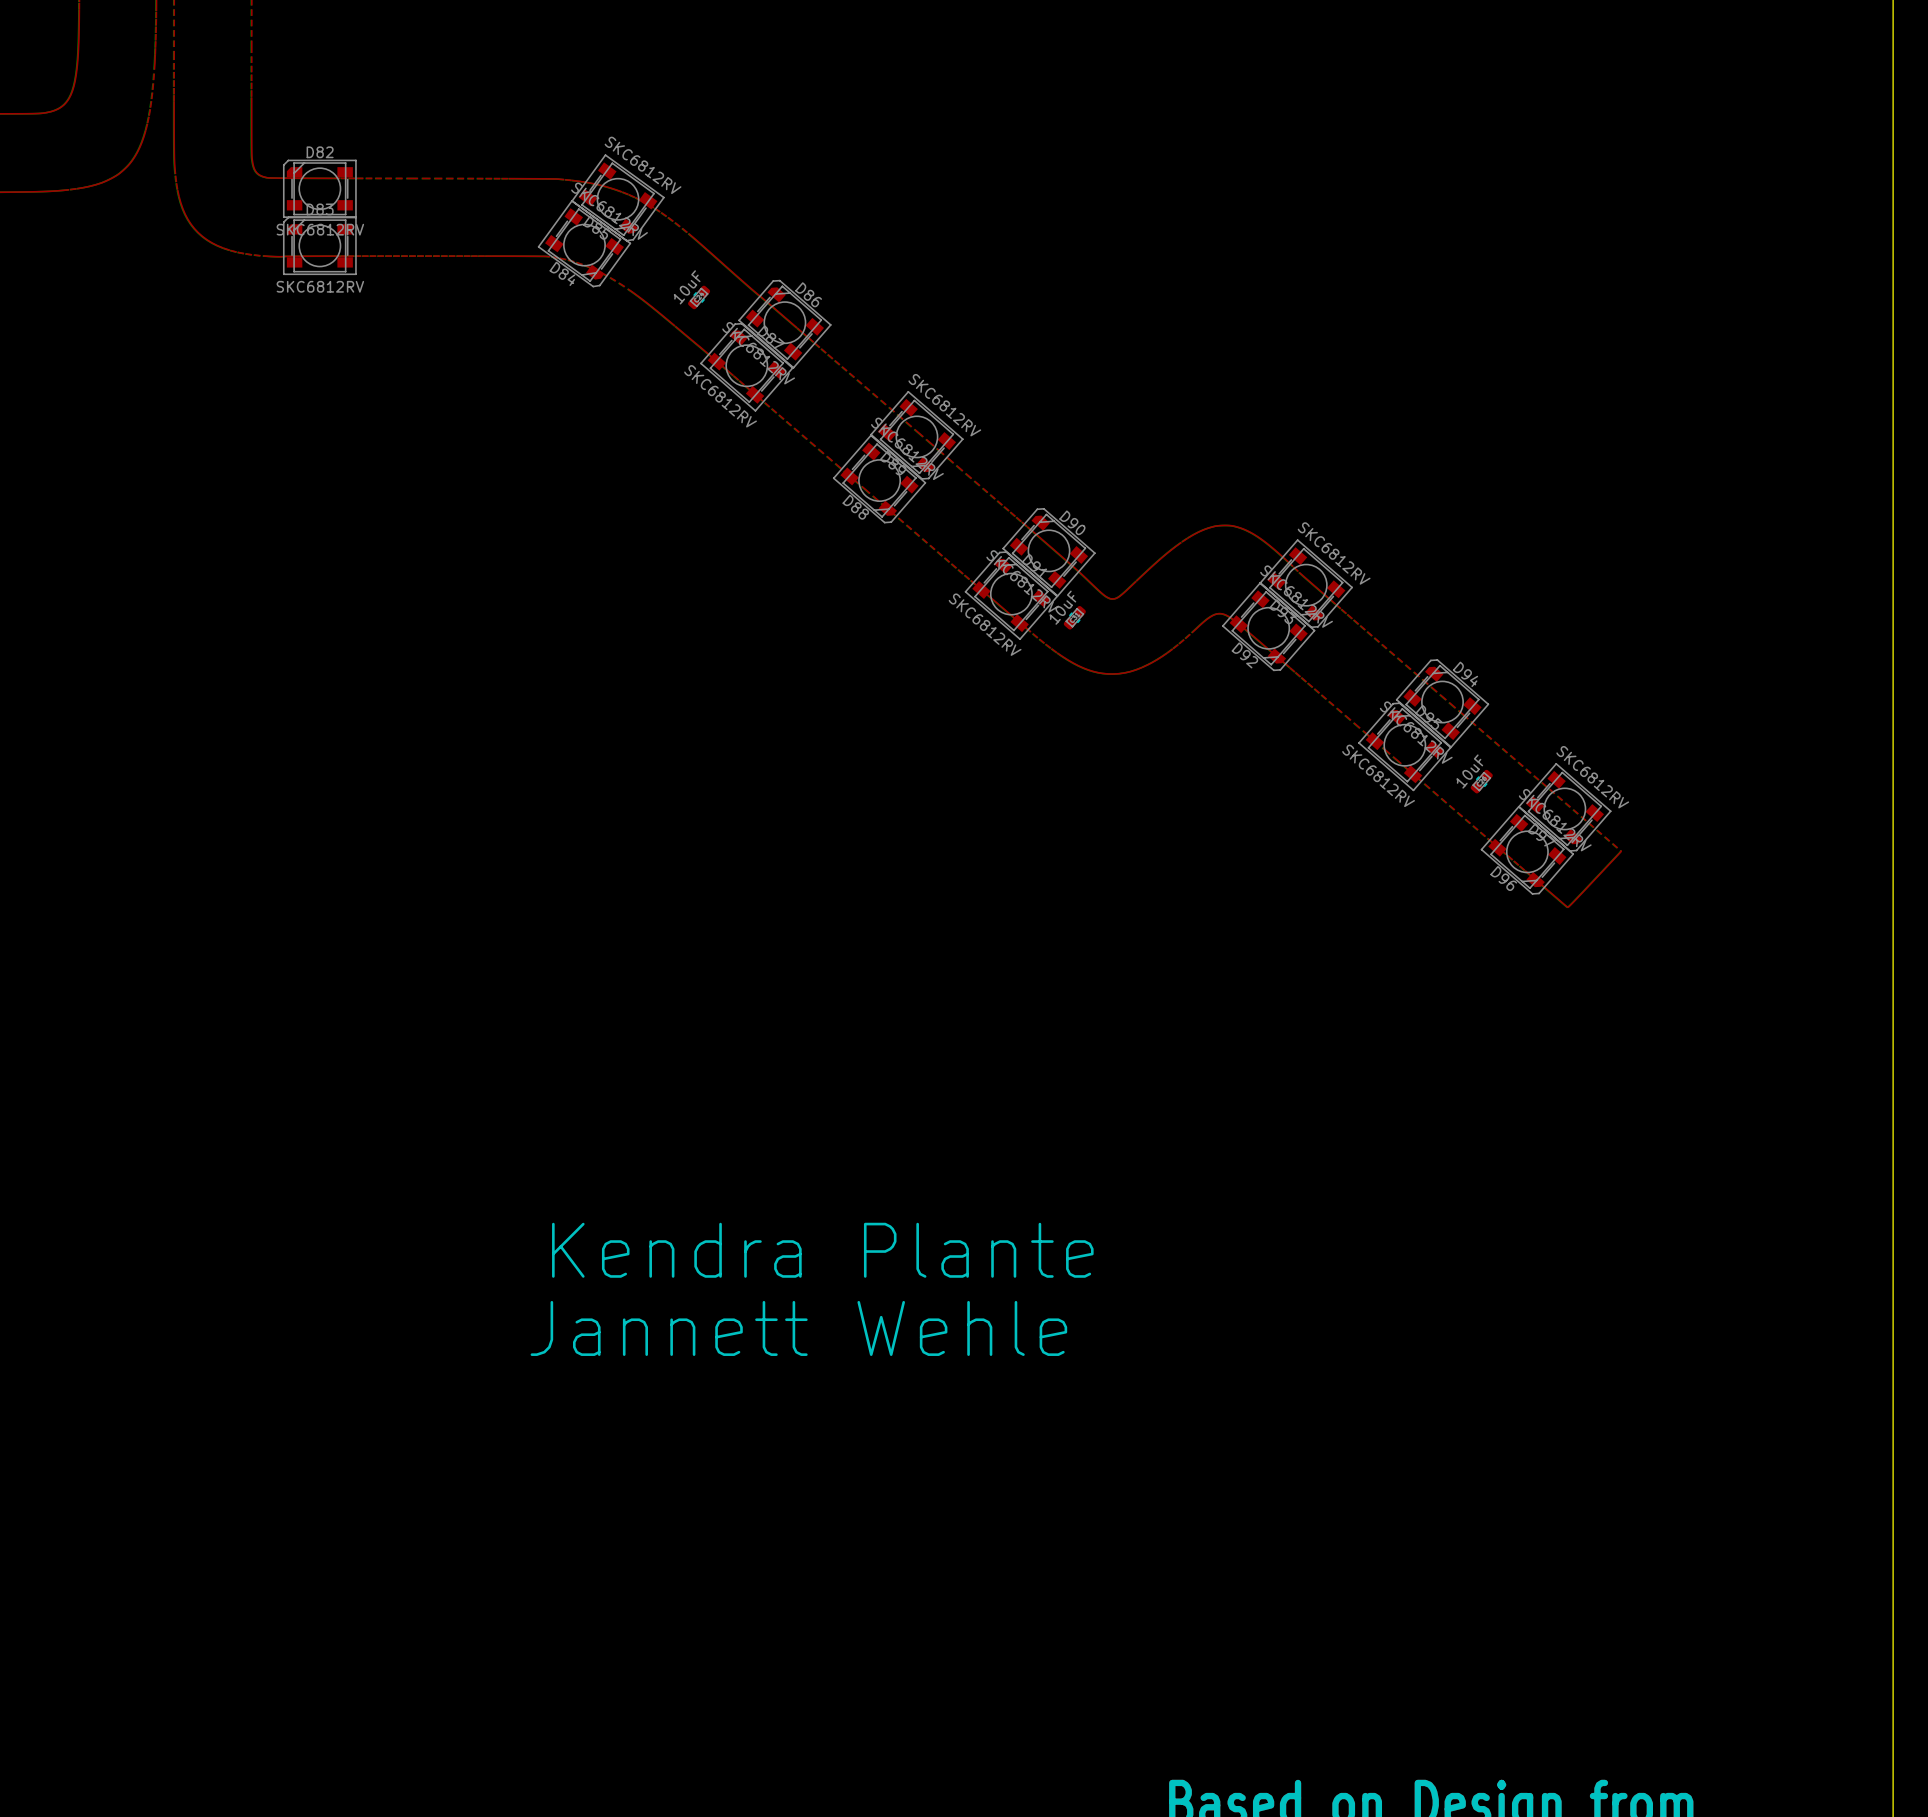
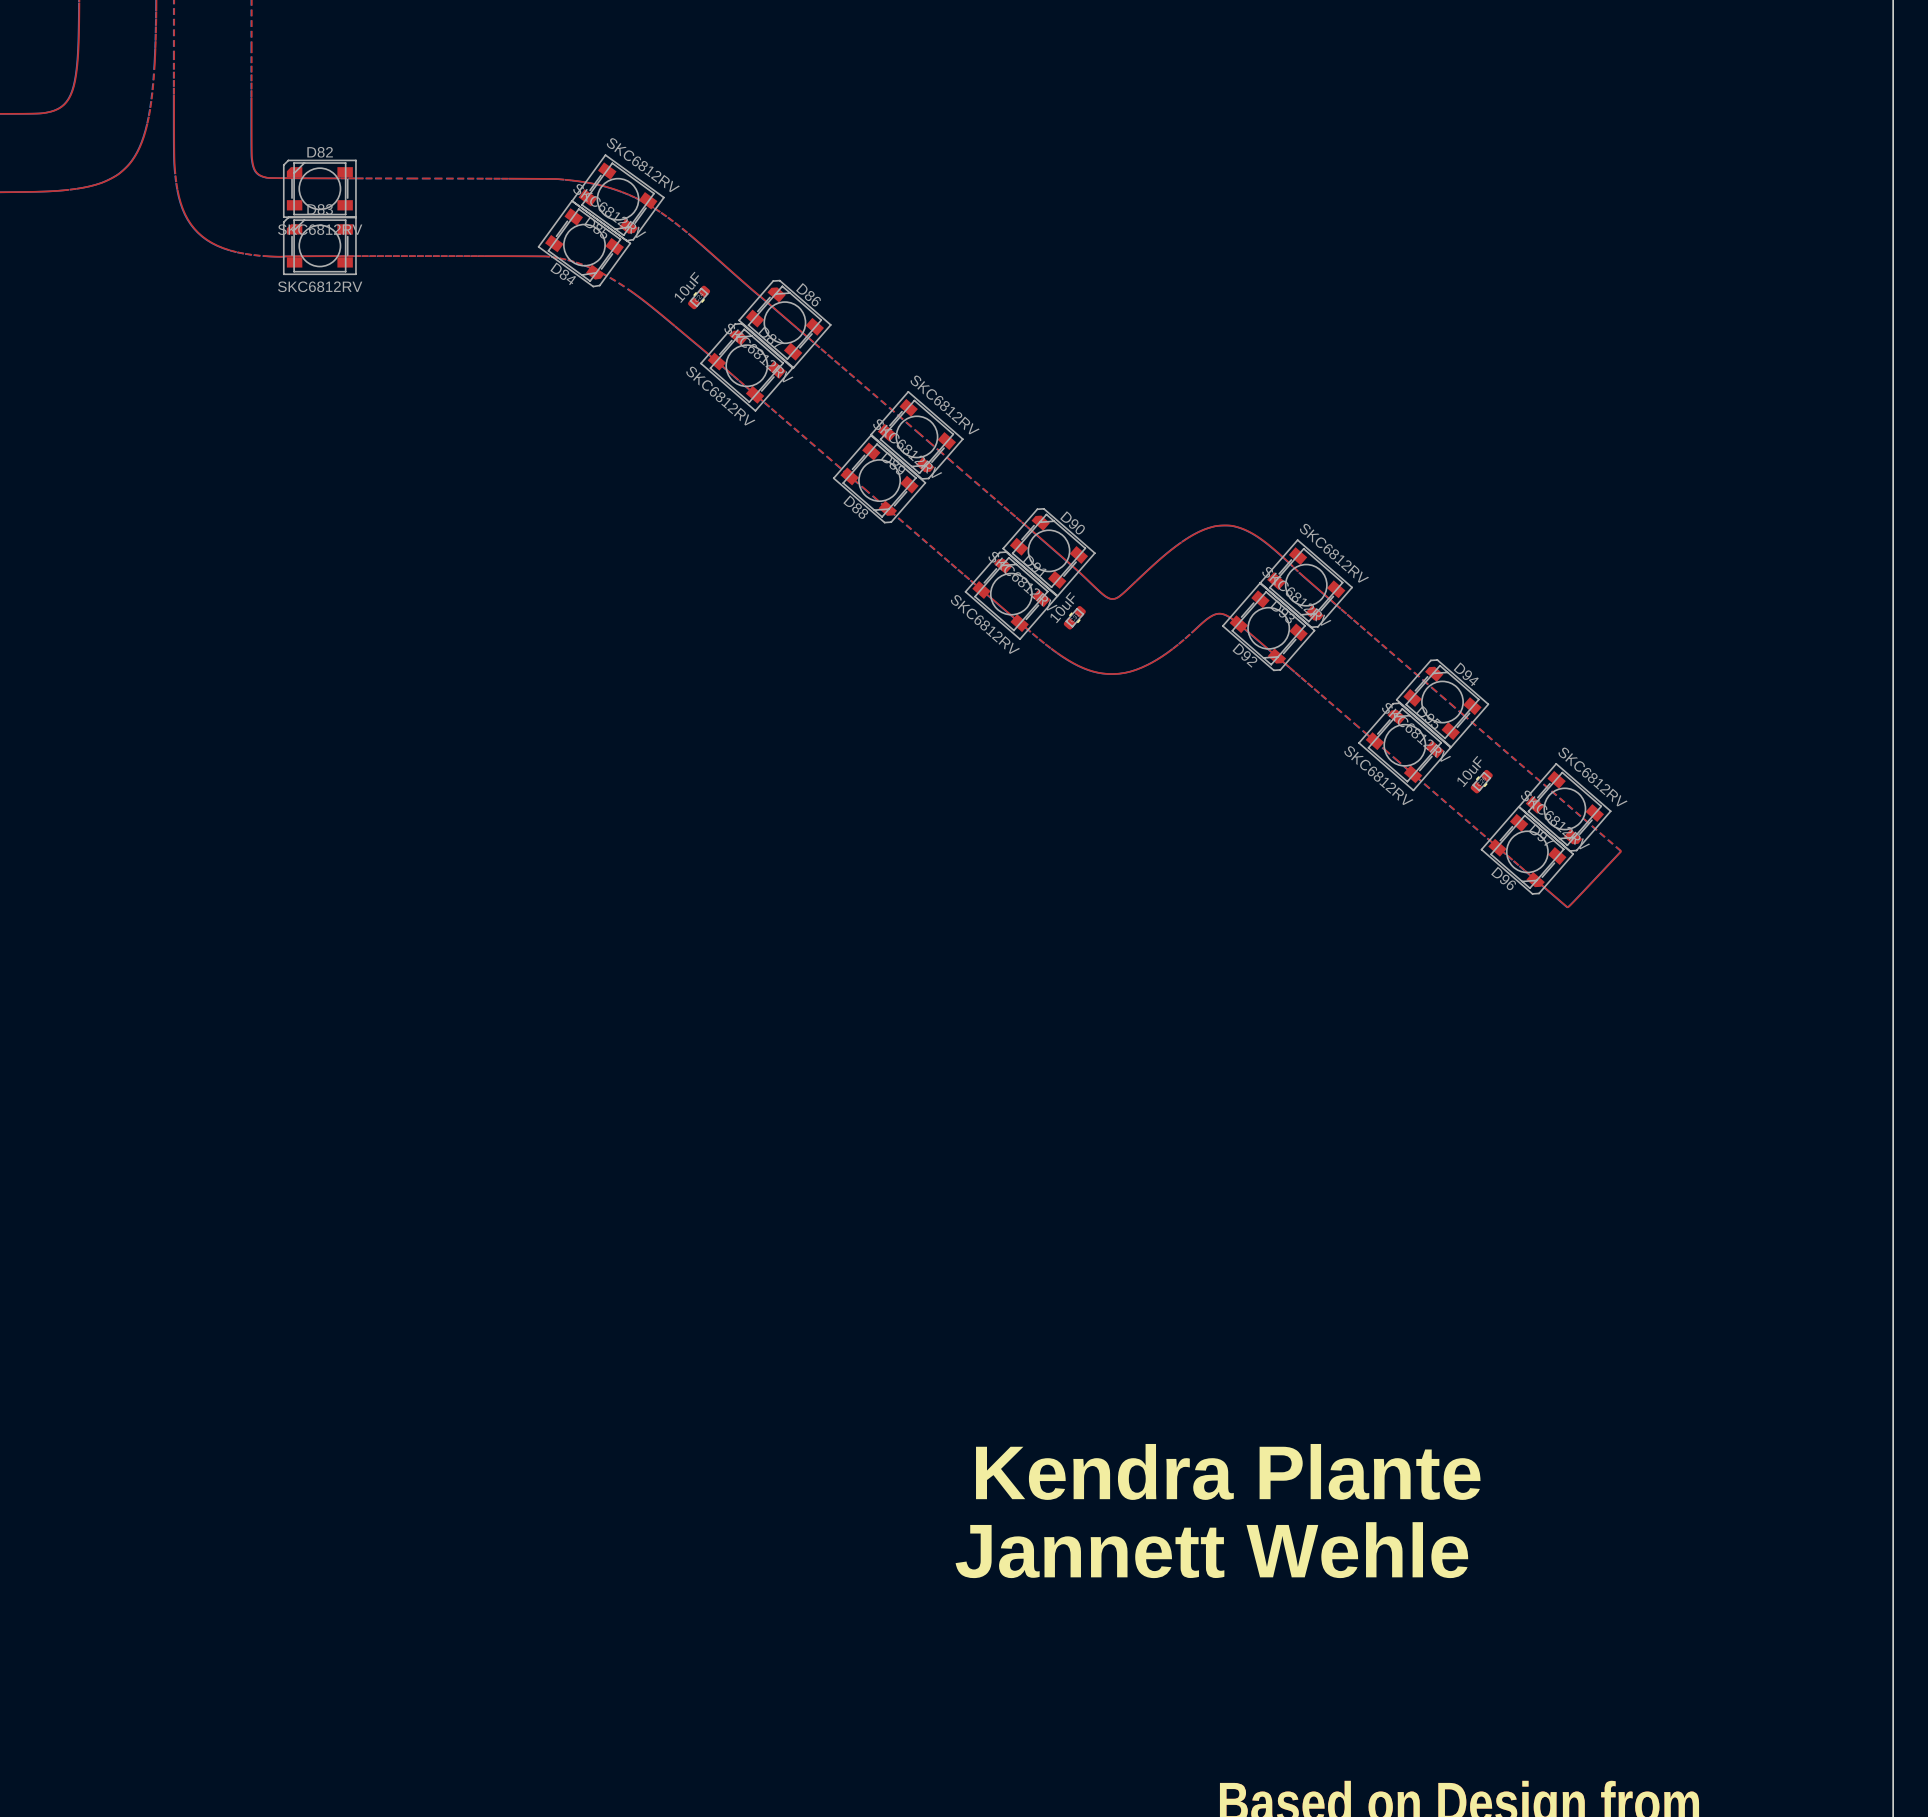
text: Kendra Plante (822, 1250) -> none
text: Jannett Wehle (798, 1328) -> none
text: none -> Kendra Plante (1228, 1471)
text: none -> Jannett Wehle (1211, 1550)

